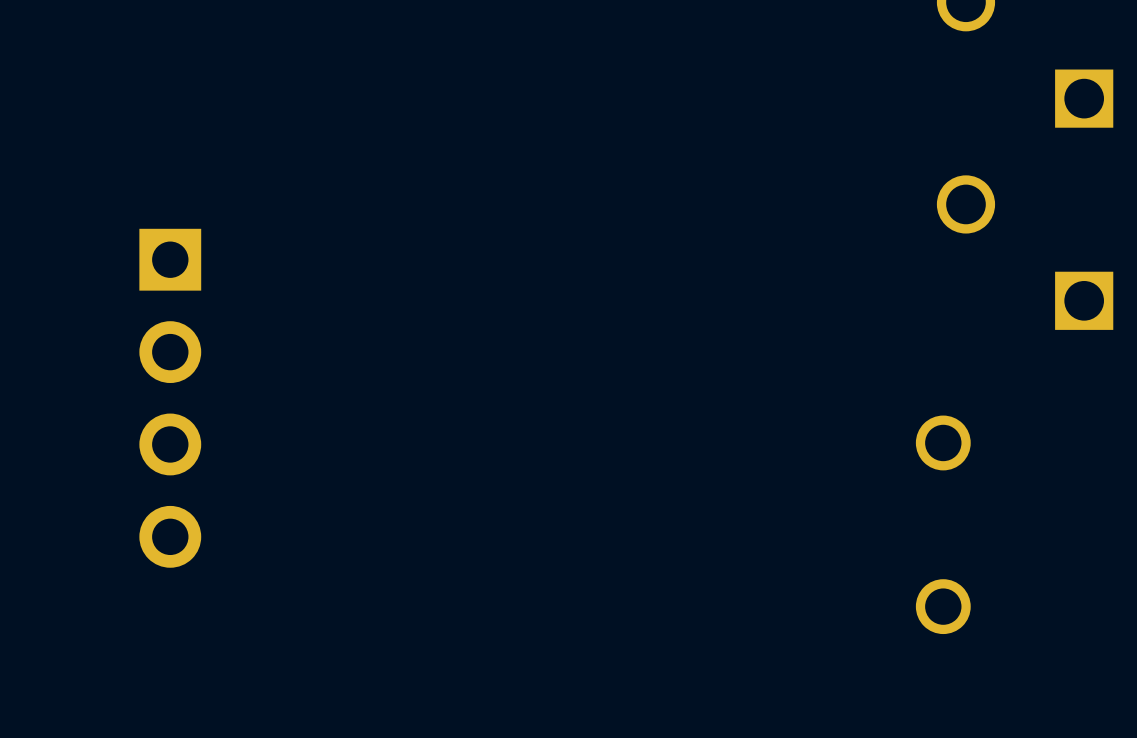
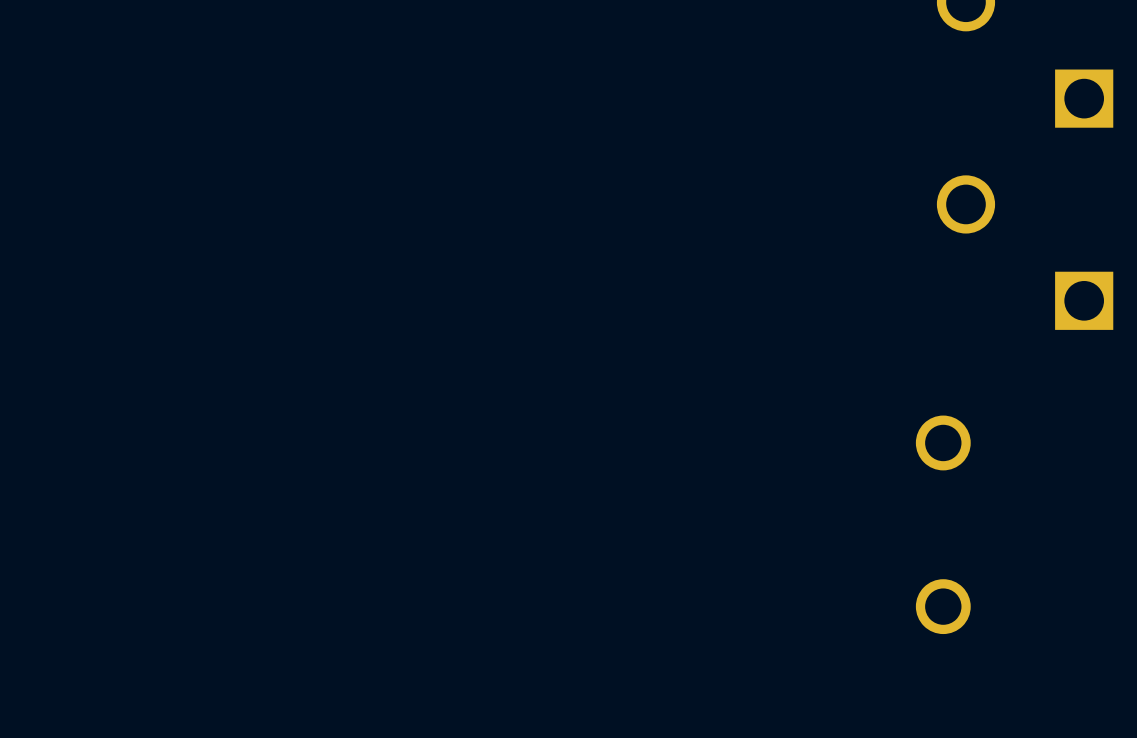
part: (170, 398) -> none

